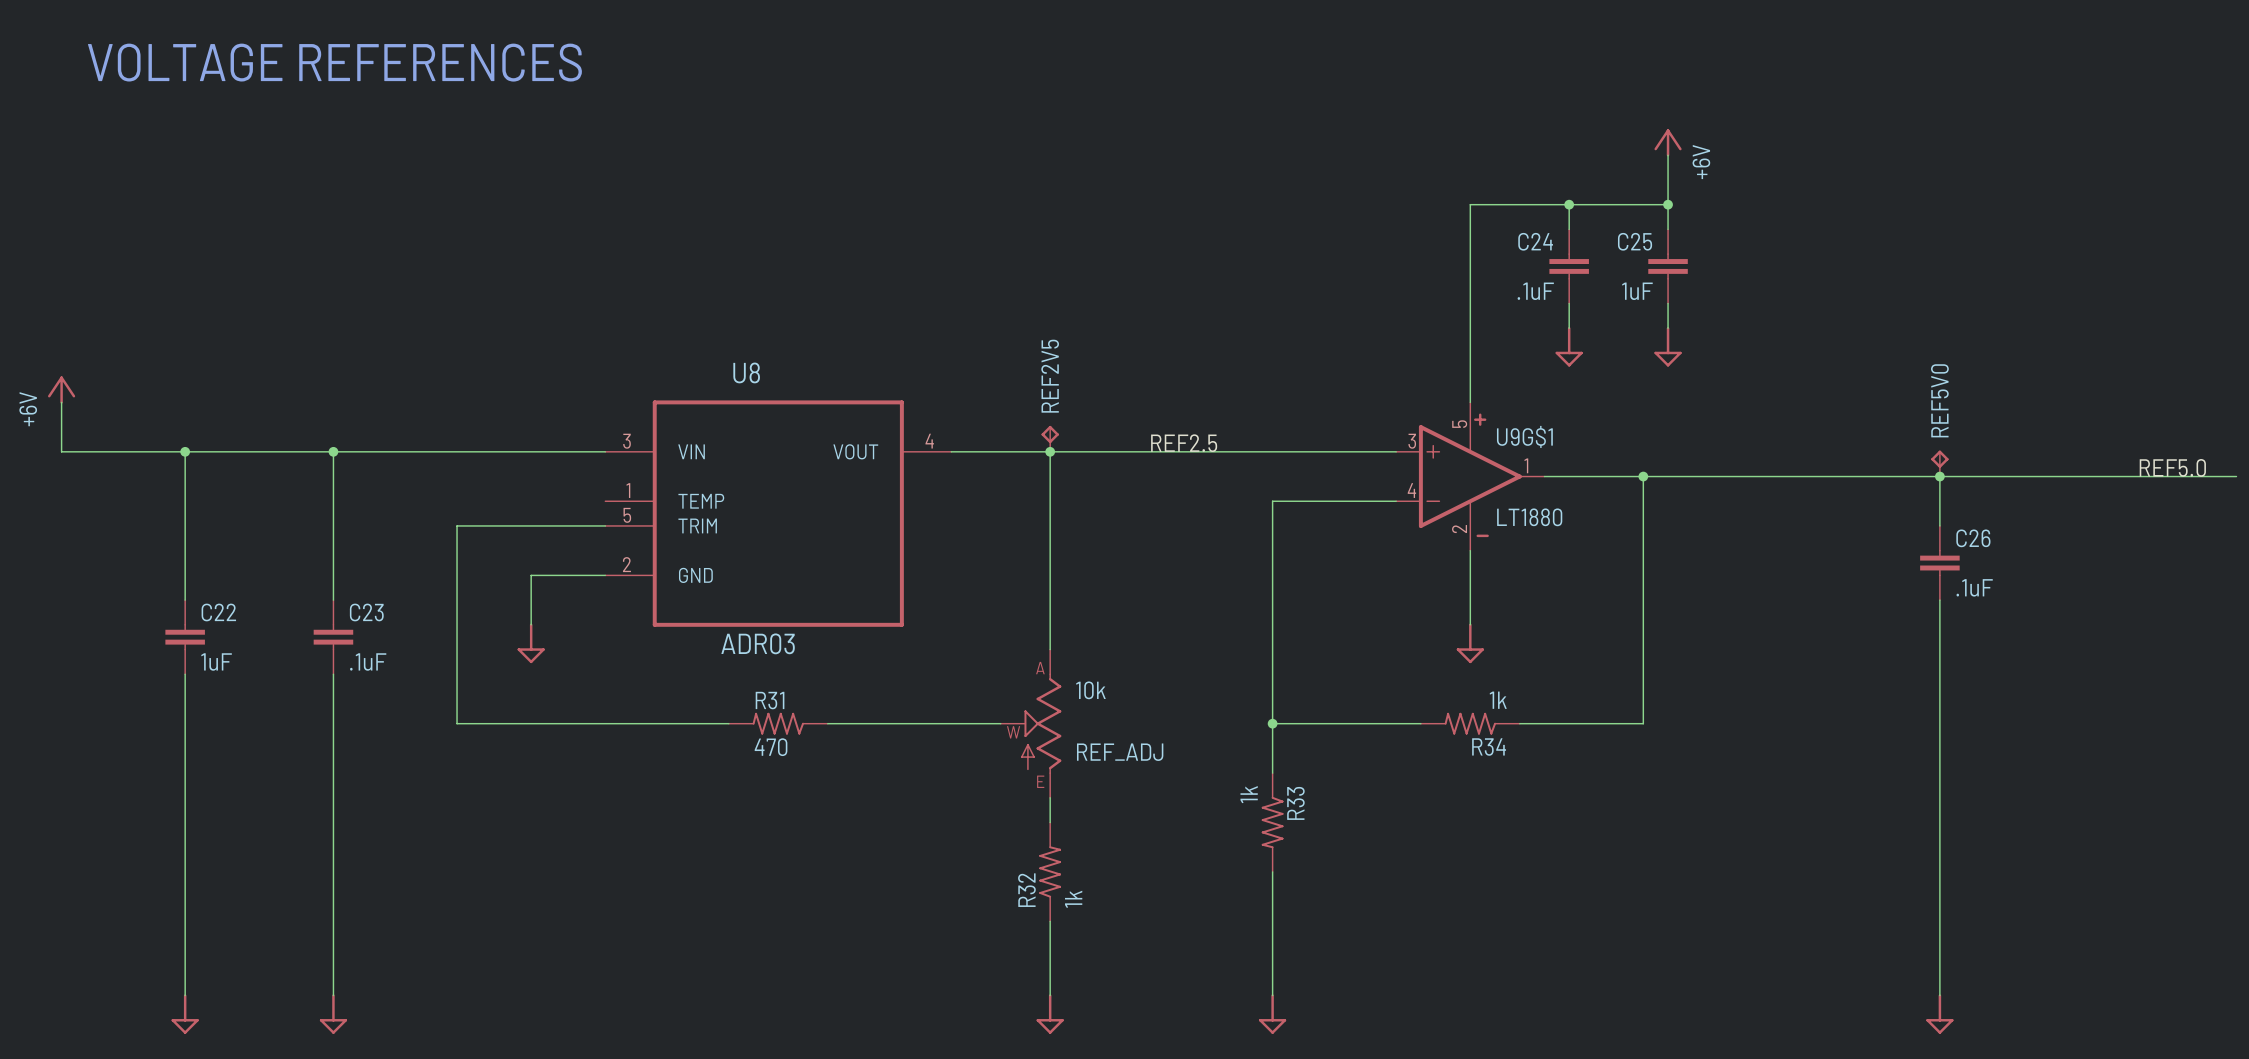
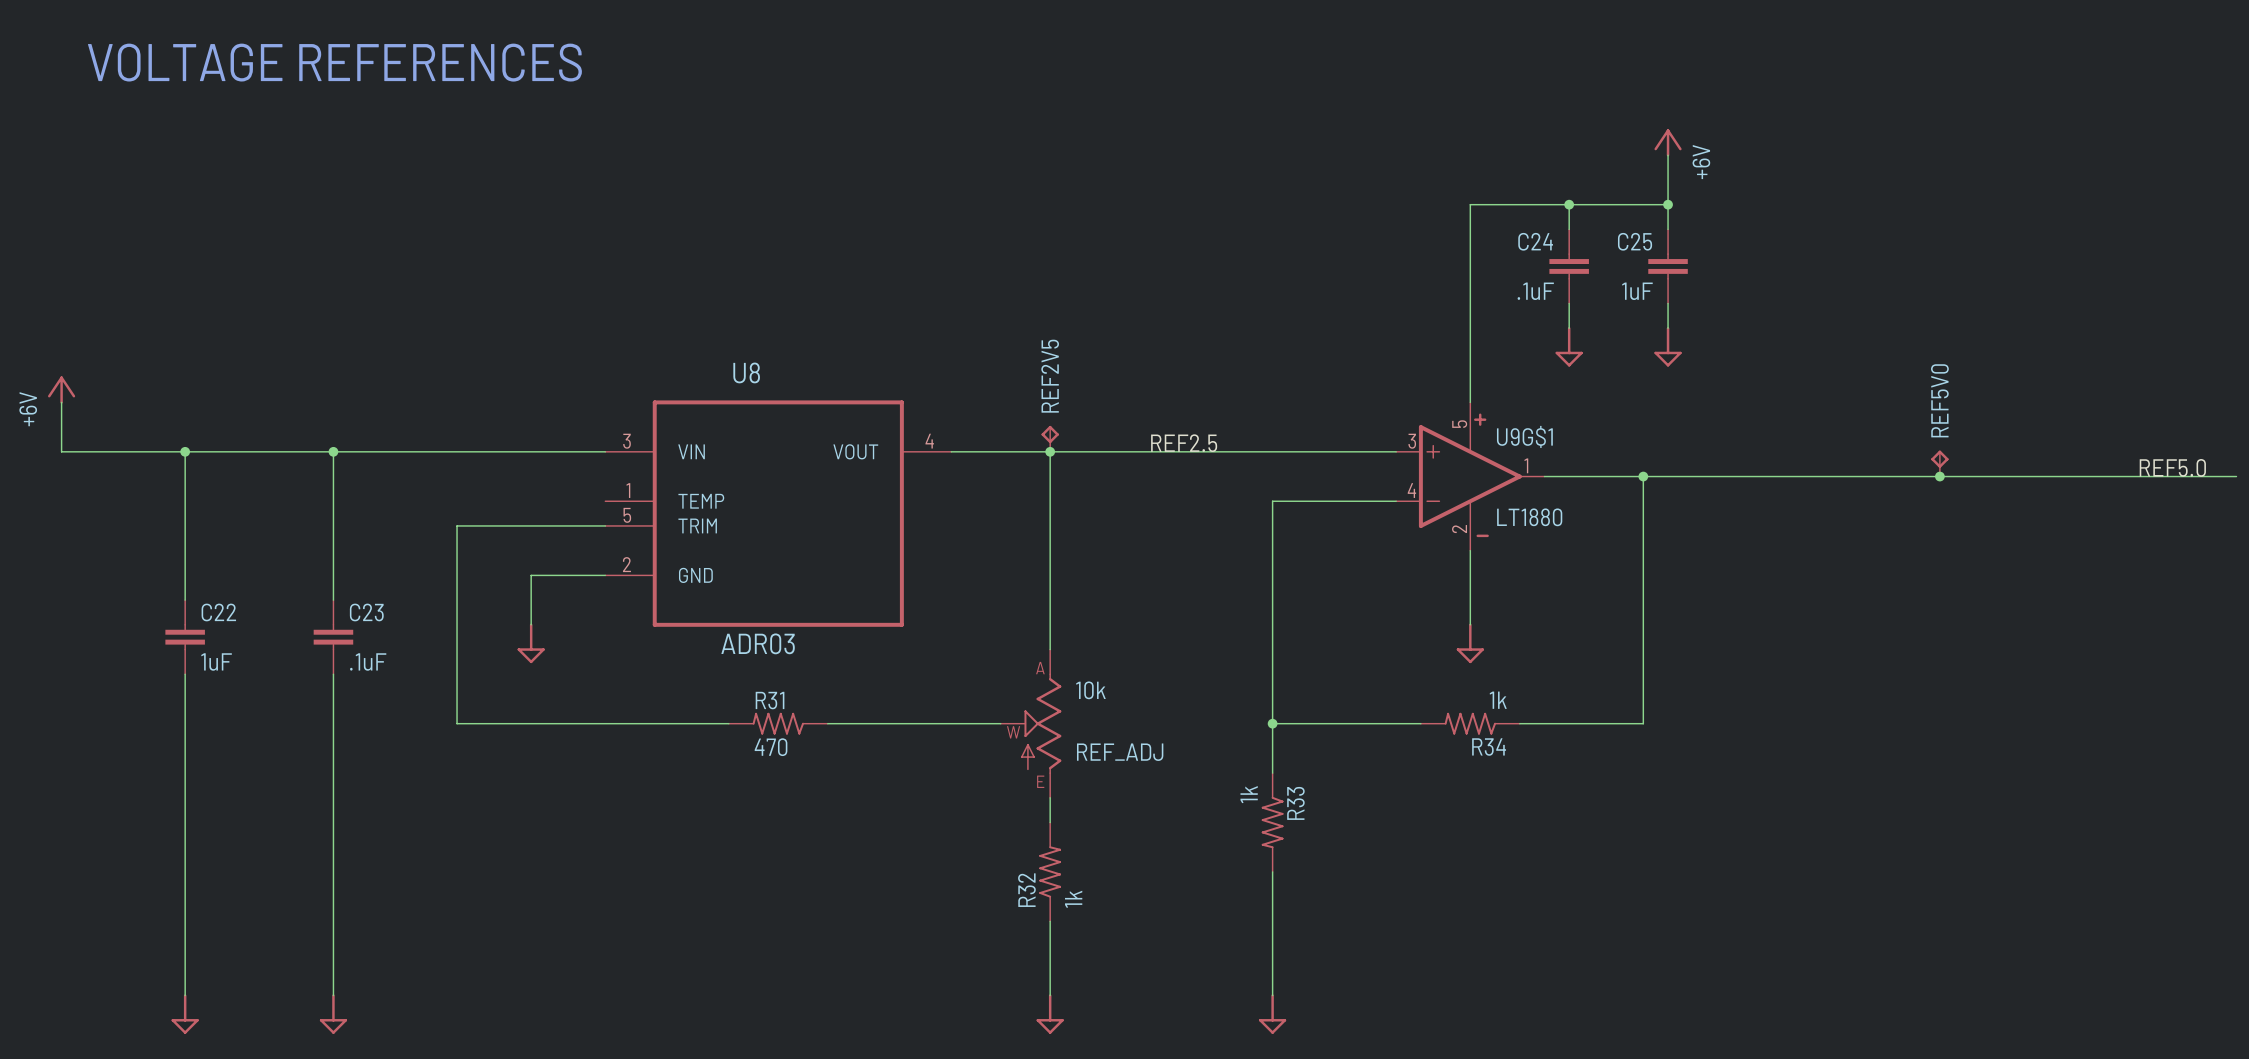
wire: (1939, 476) (1939, 525) -> none
C26: .1uF (1939, 563) -> none
wire: (1939, 600) (1939, 995) -> none
part: (1939, 1014) -> none

